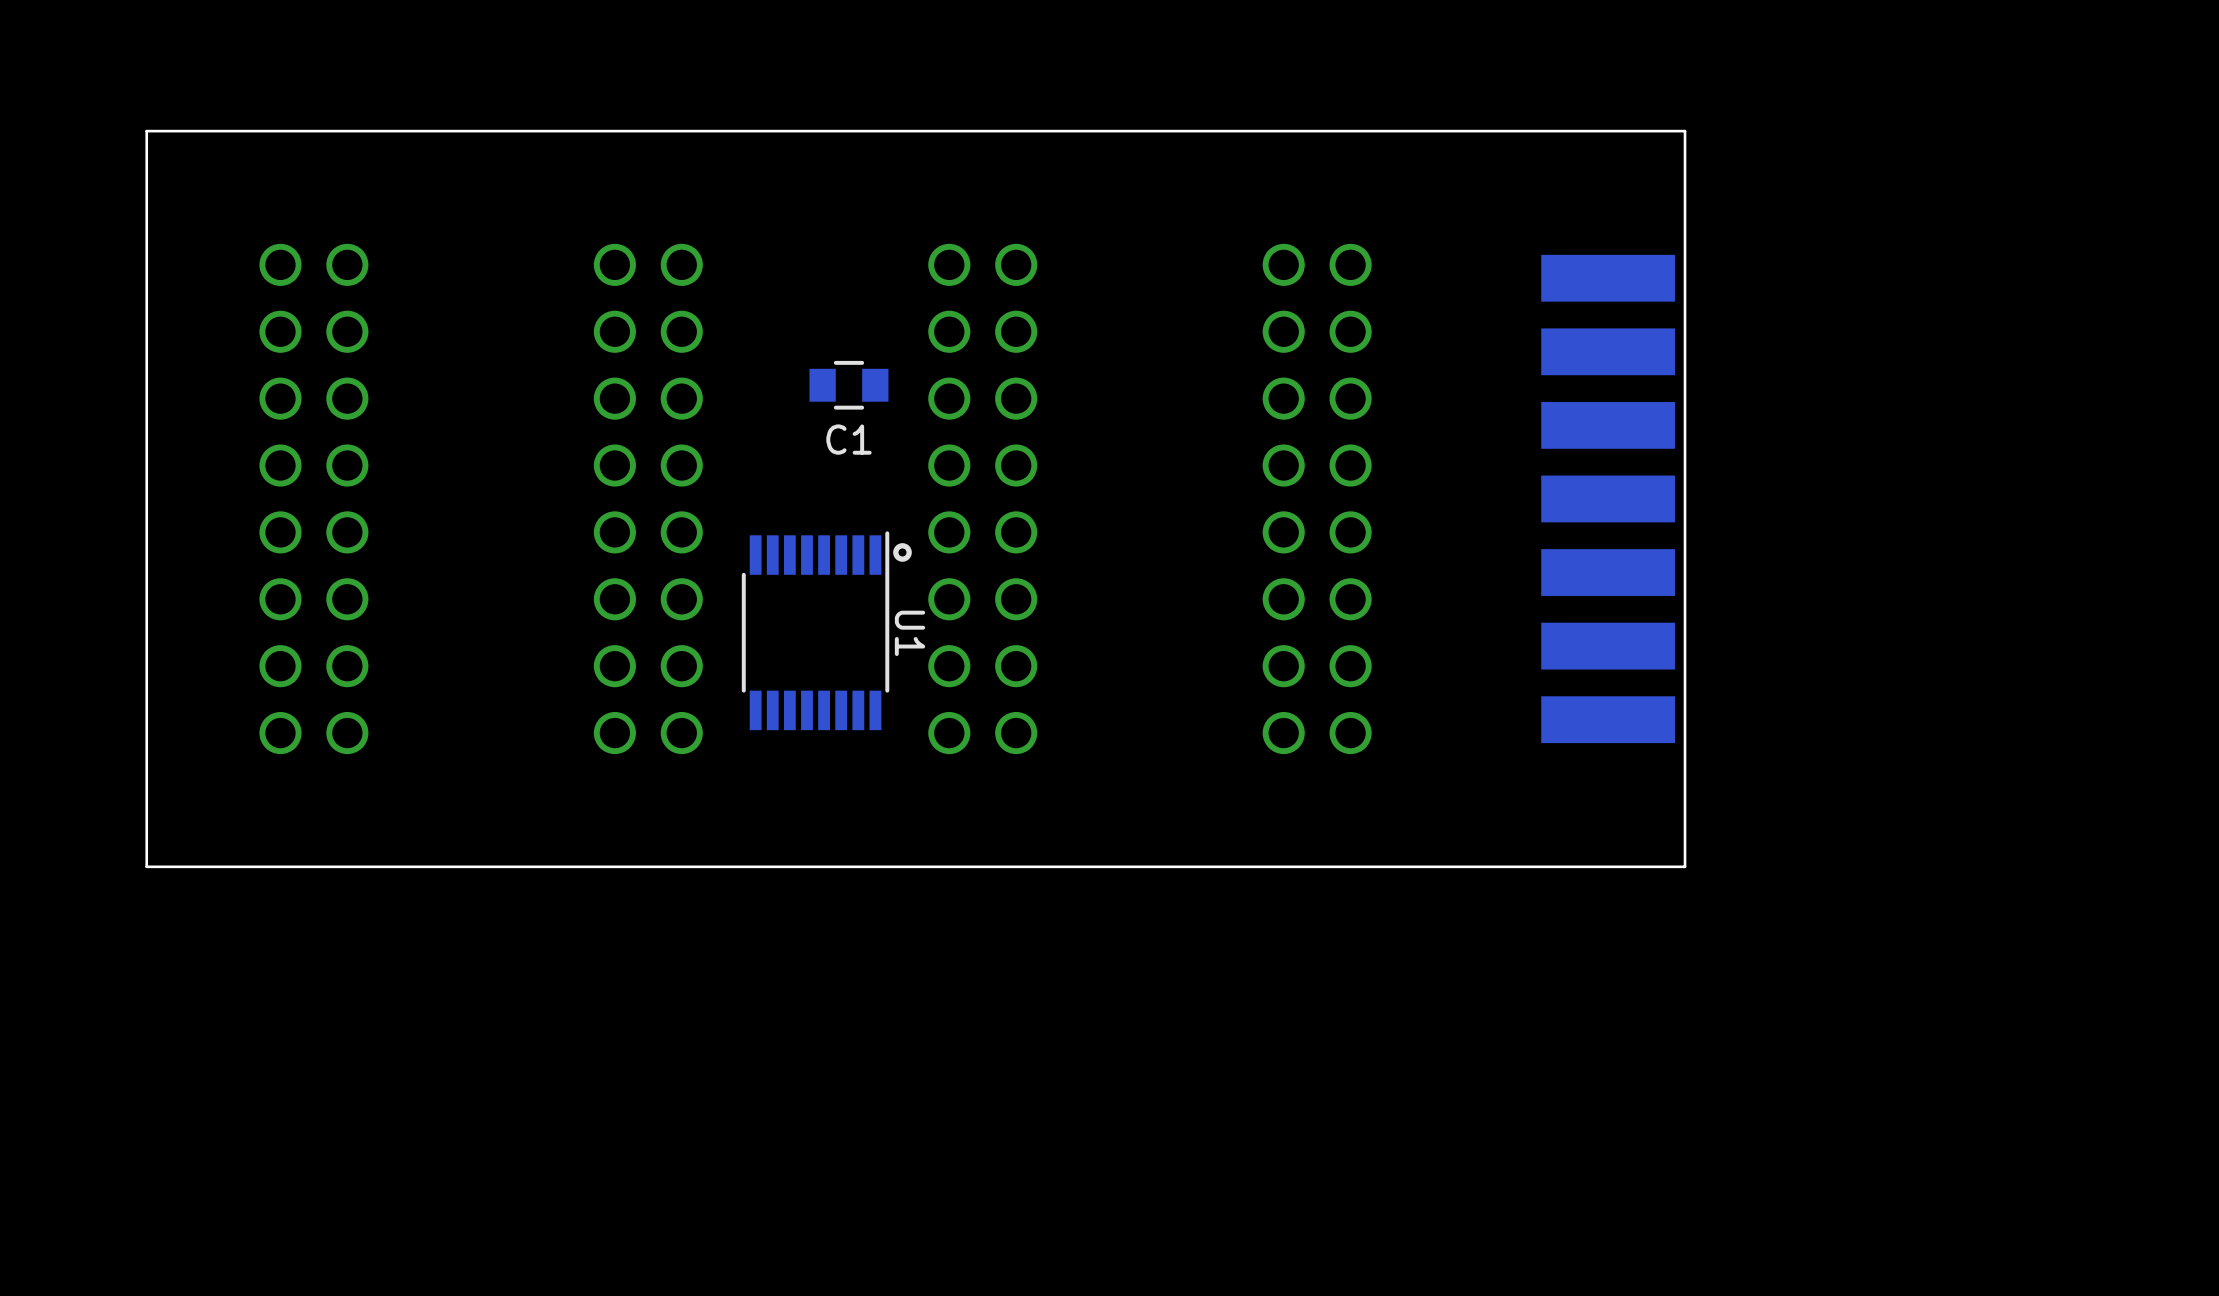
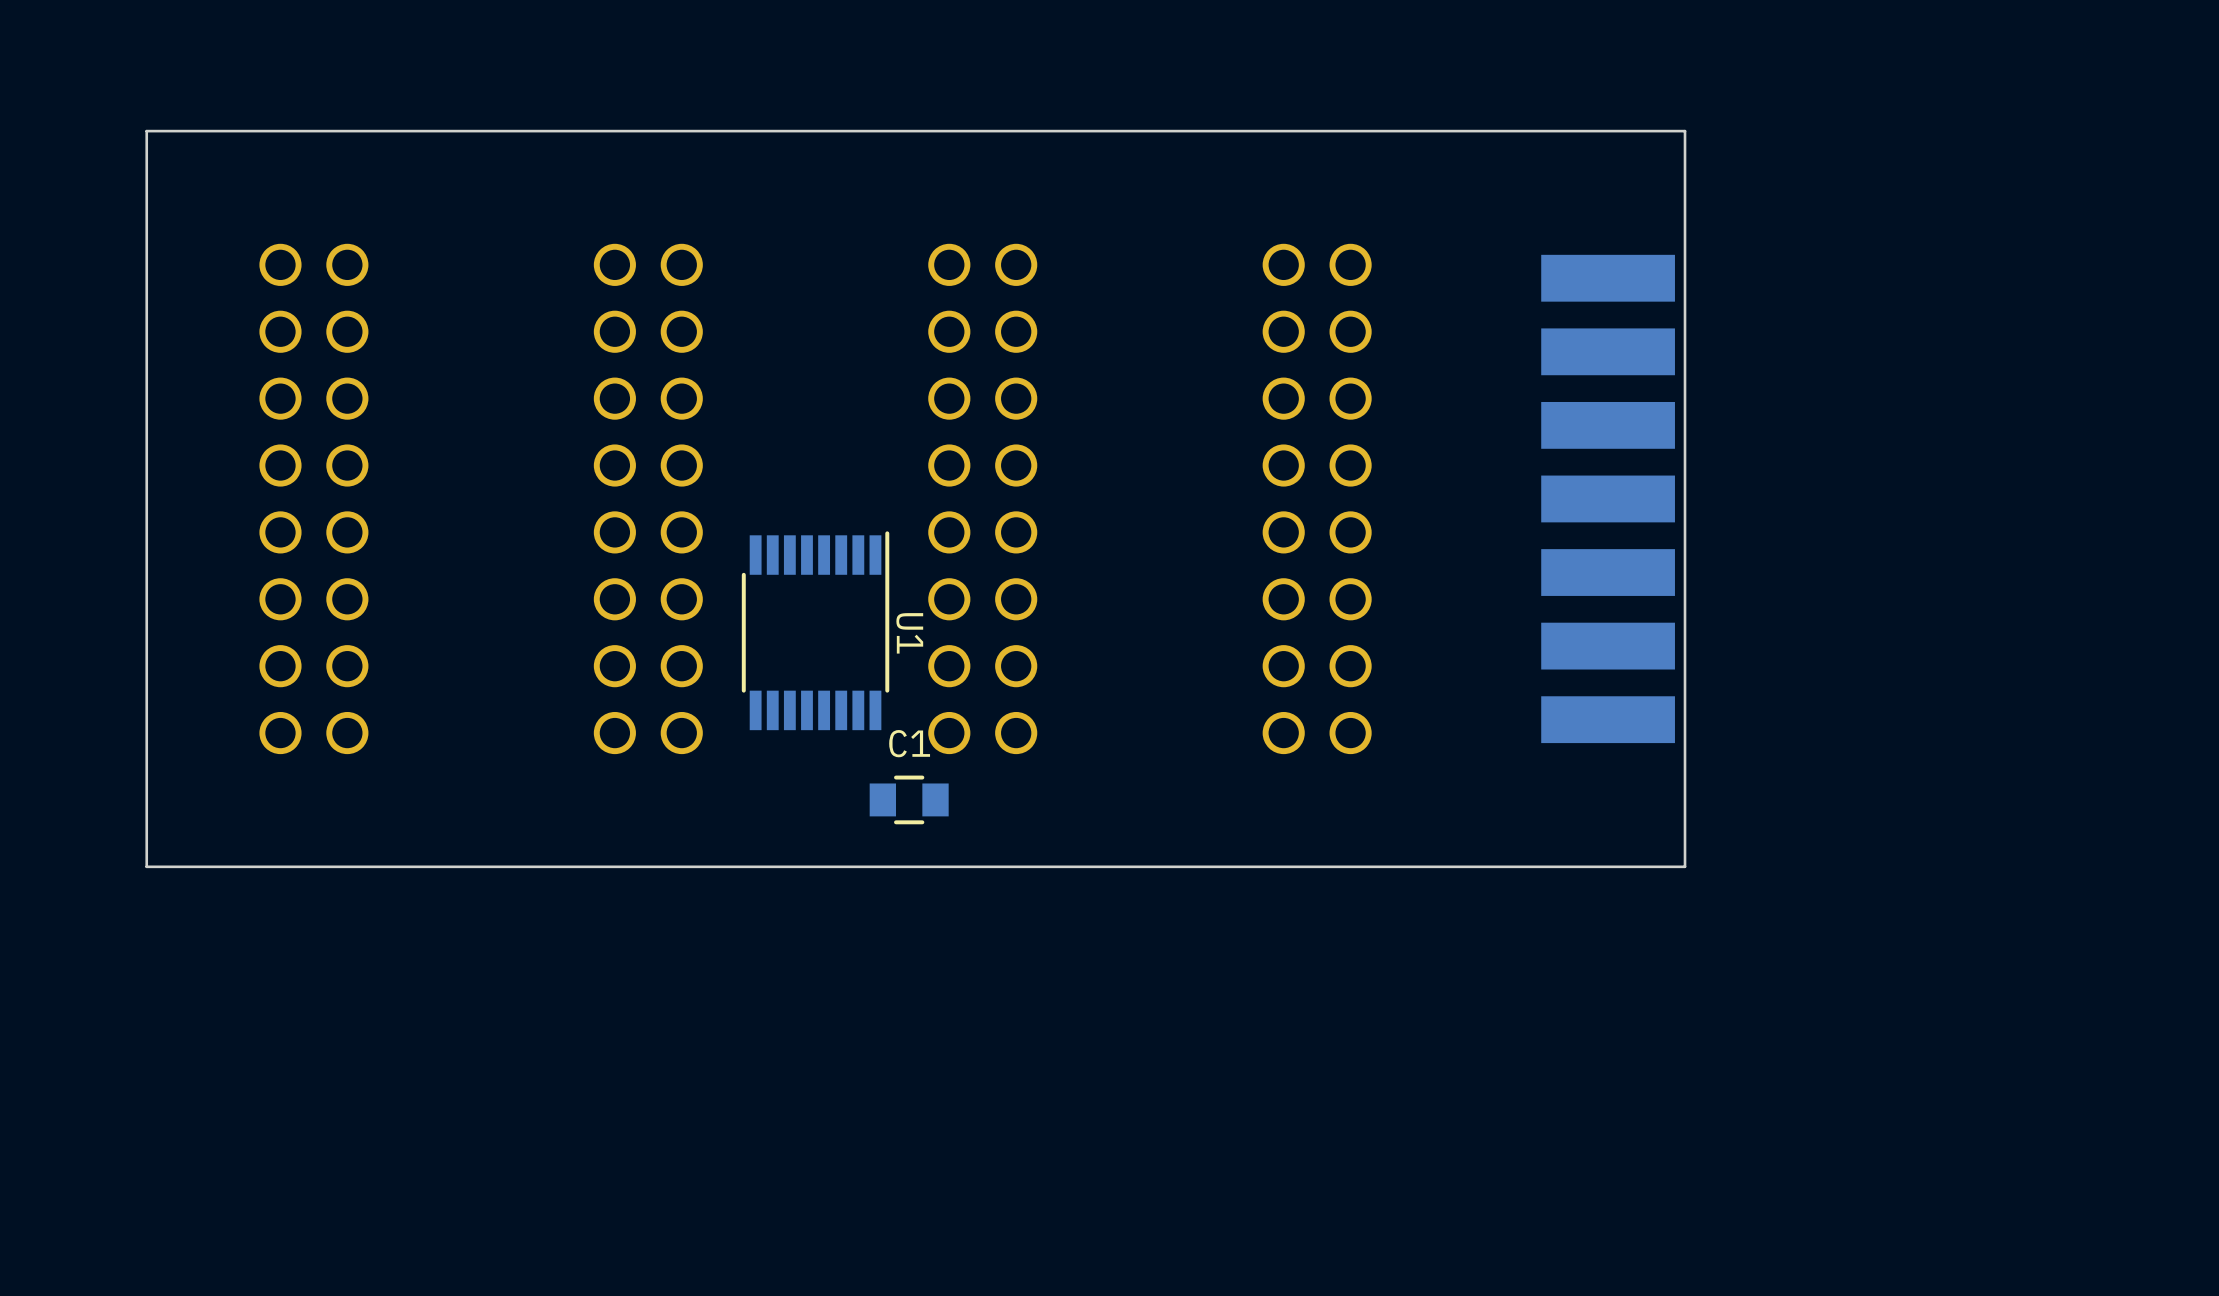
C1 position: (848, 385) -> (909, 799)
C1 name position: C1 (848, 439) -> C1 (909, 743)
drawing: [893, 543, 912, 562] -> none

